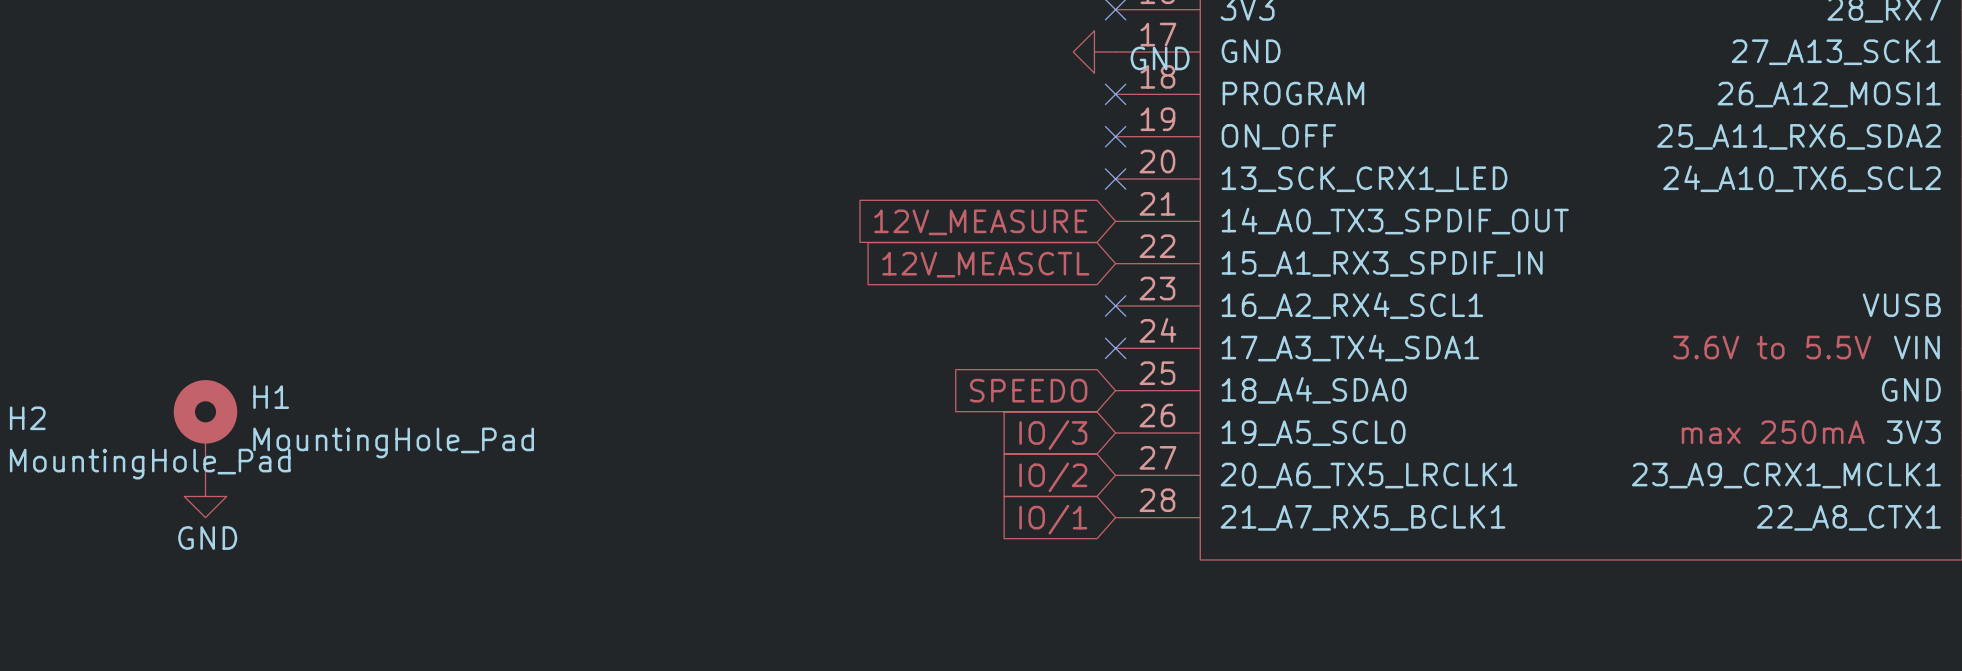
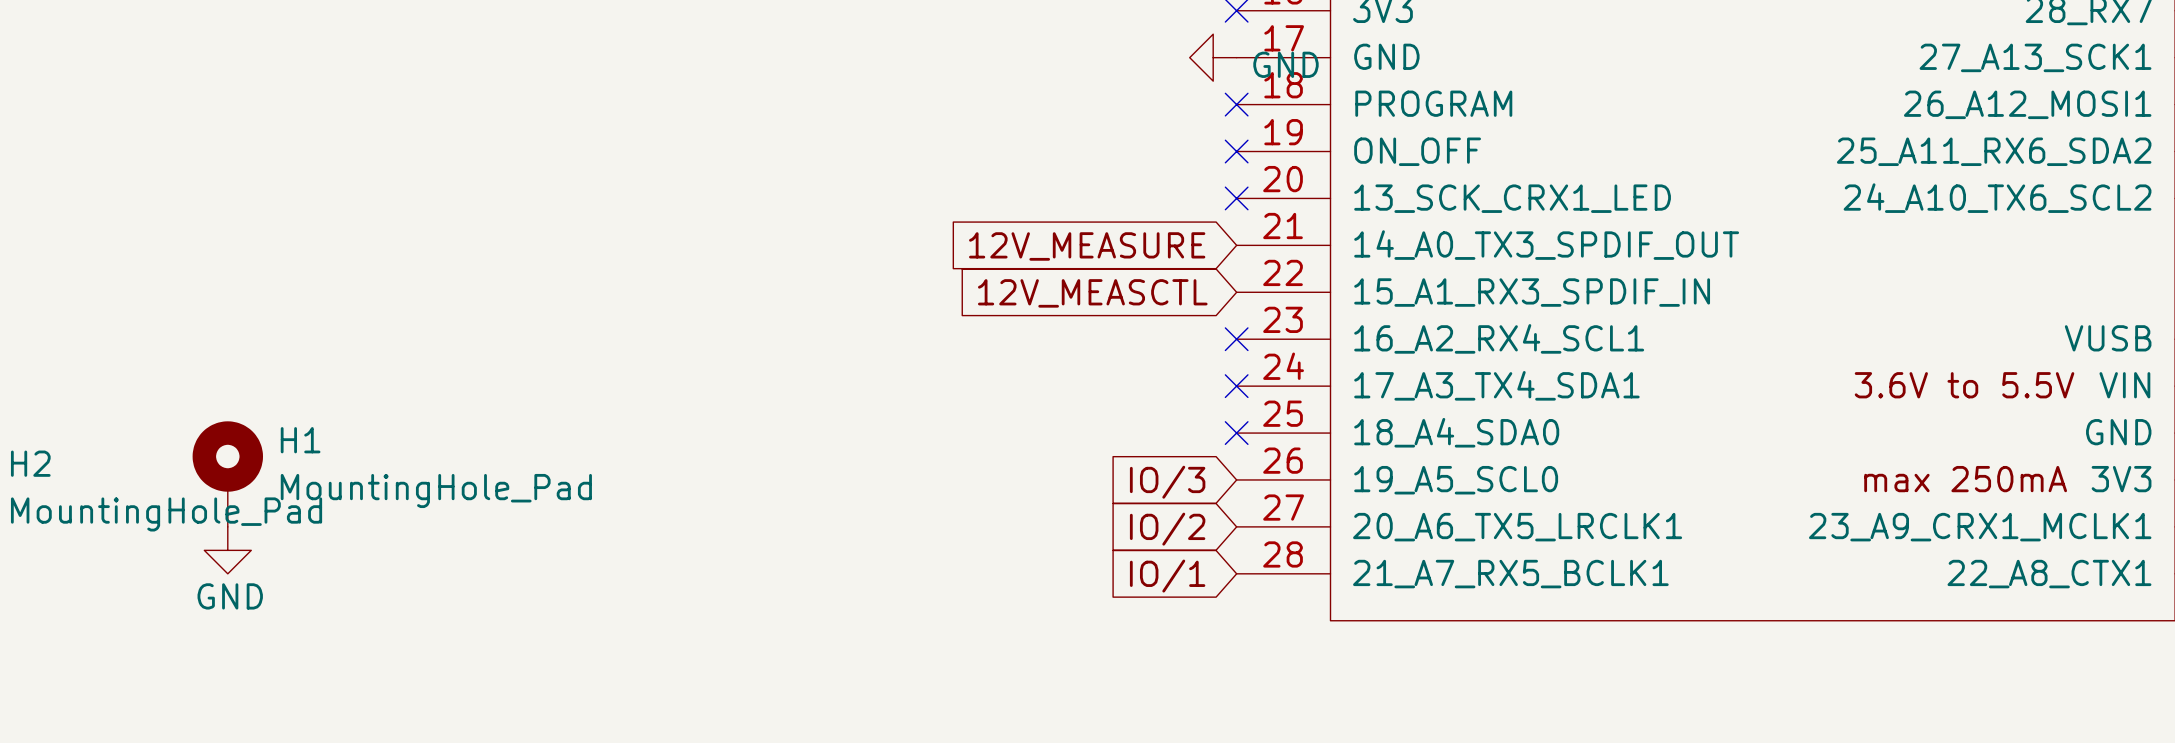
global label: SPEEDO (1028, 390) -> none
no-connect mark: none -> (1236, 433)

